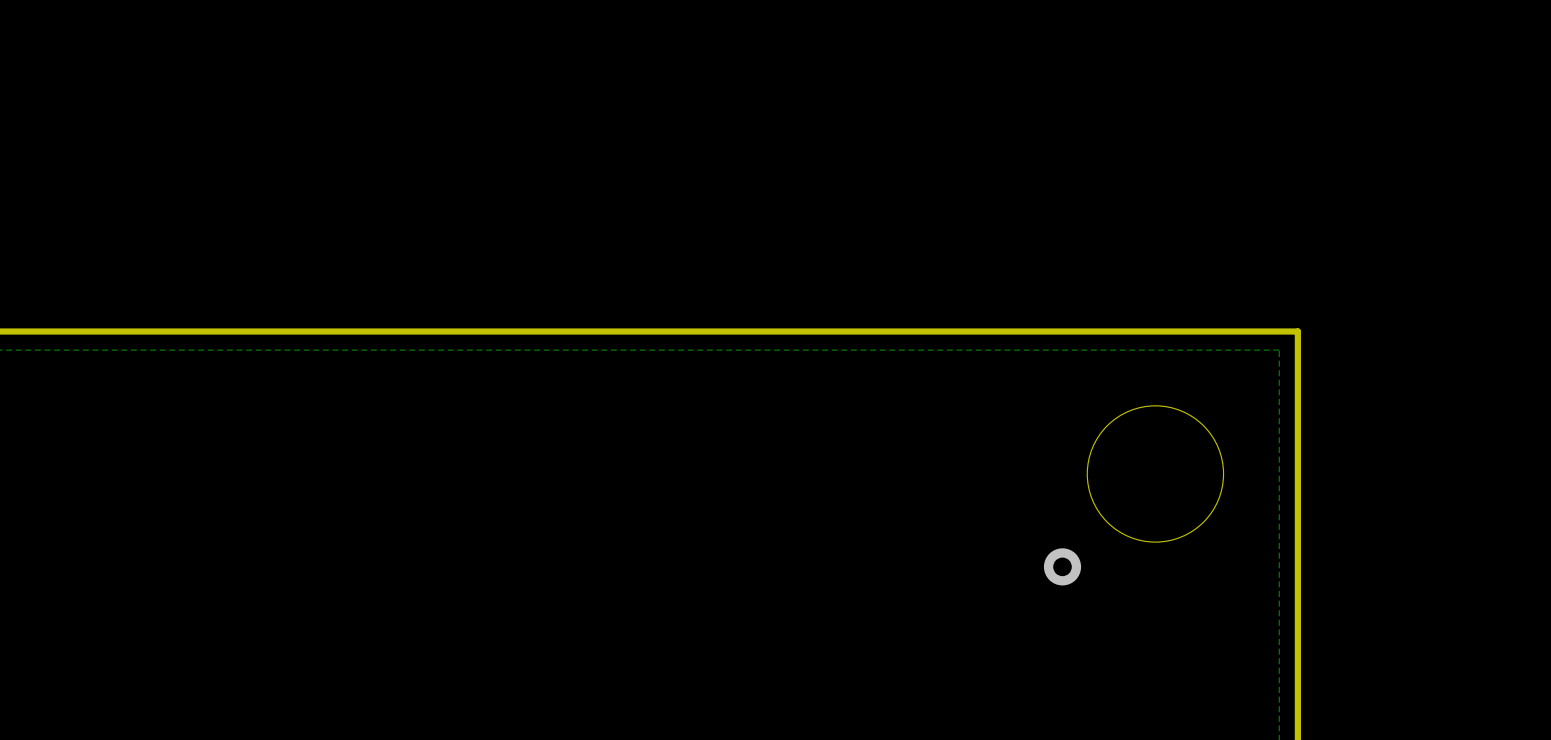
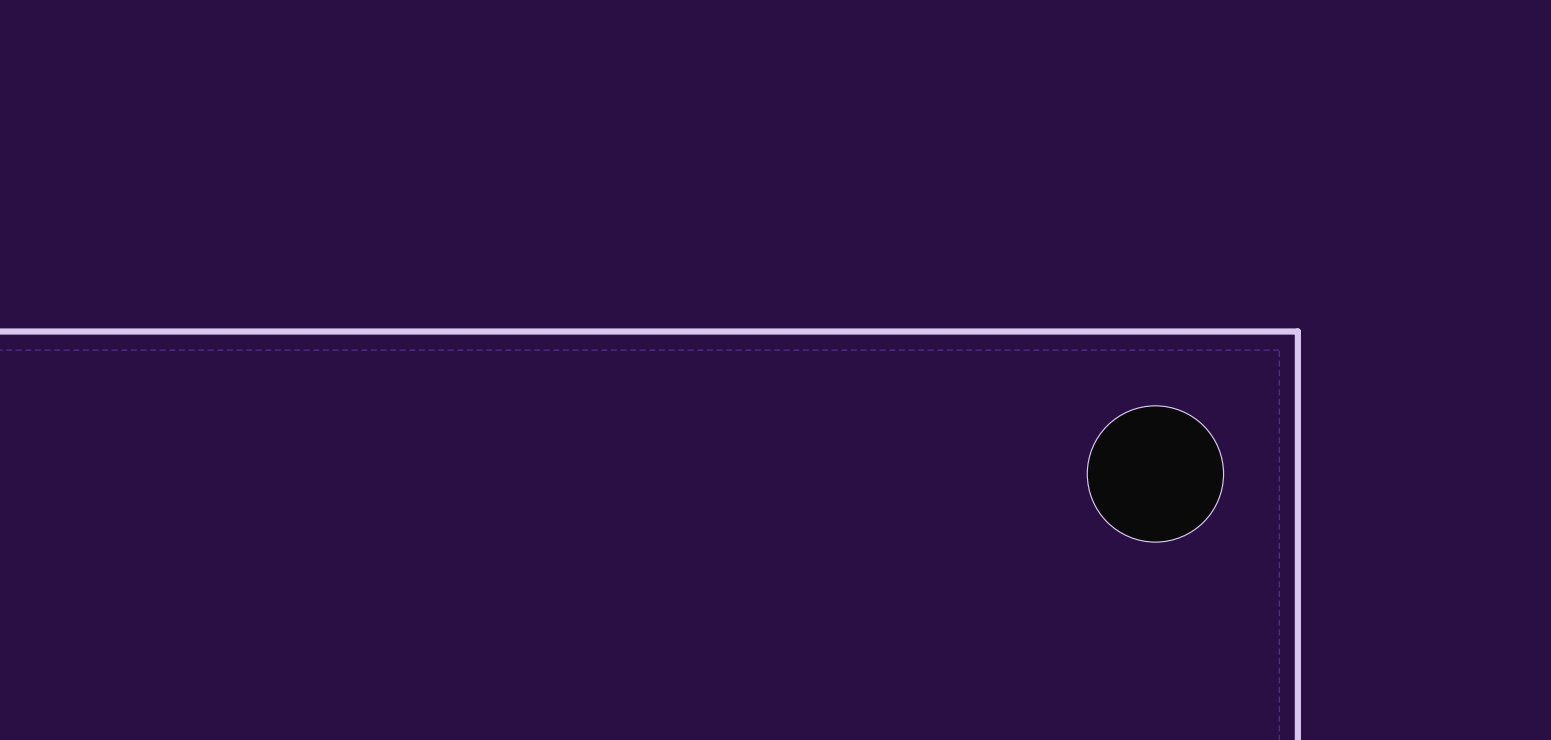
via: (1062, 566) -> none

